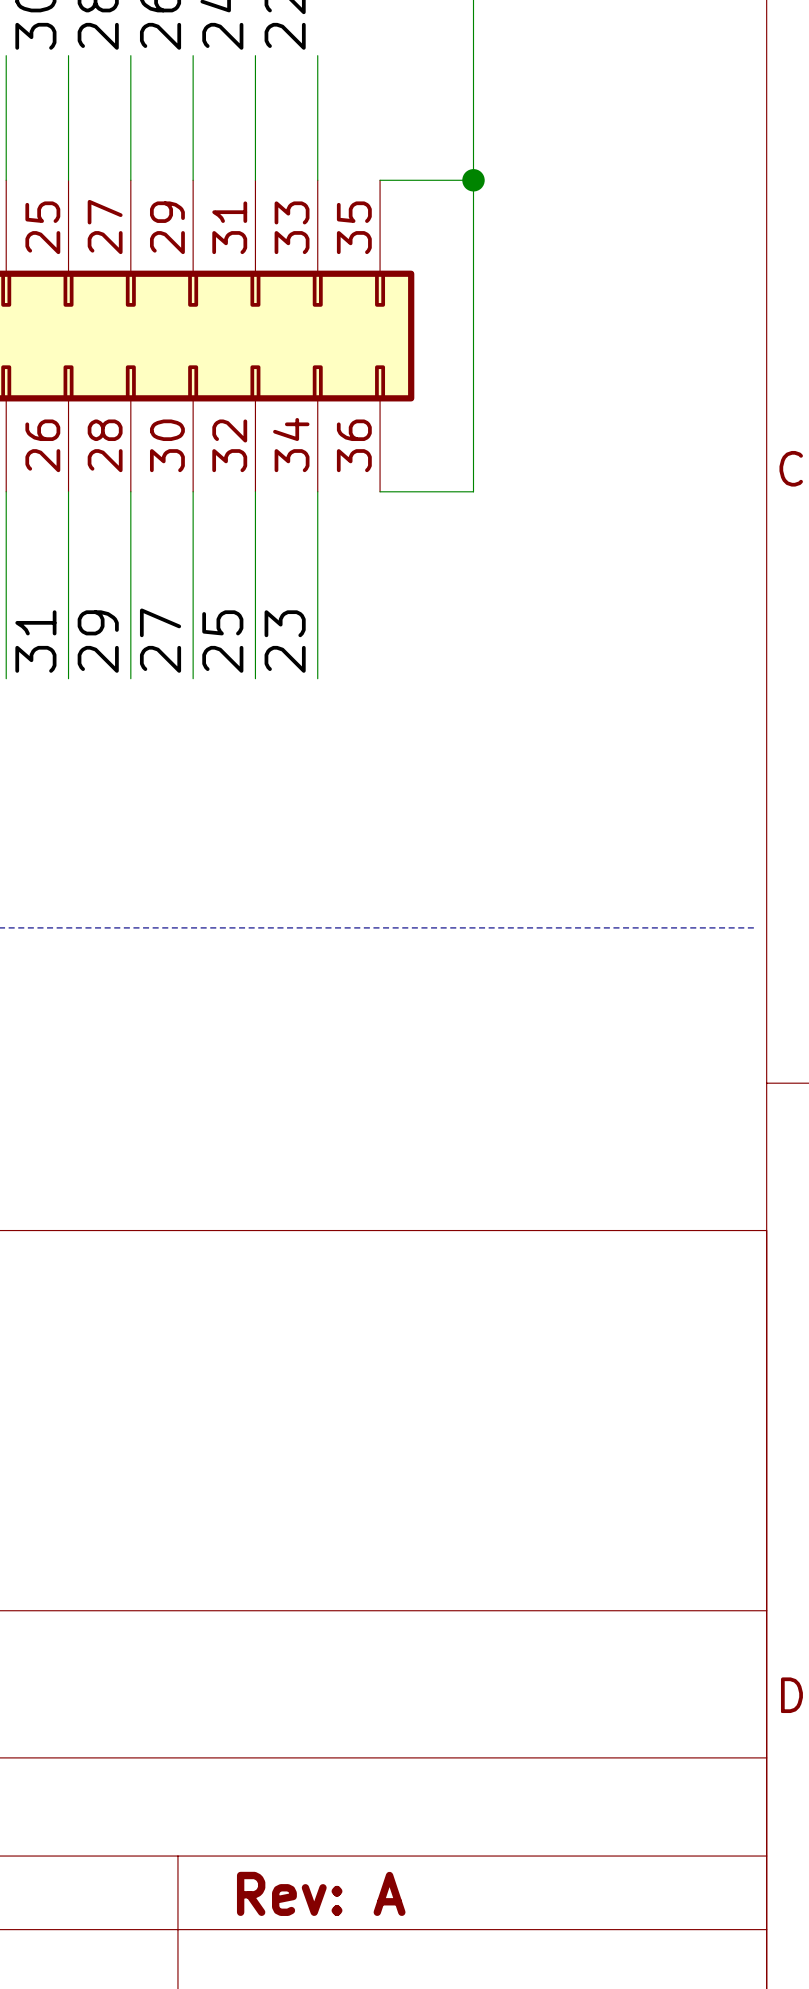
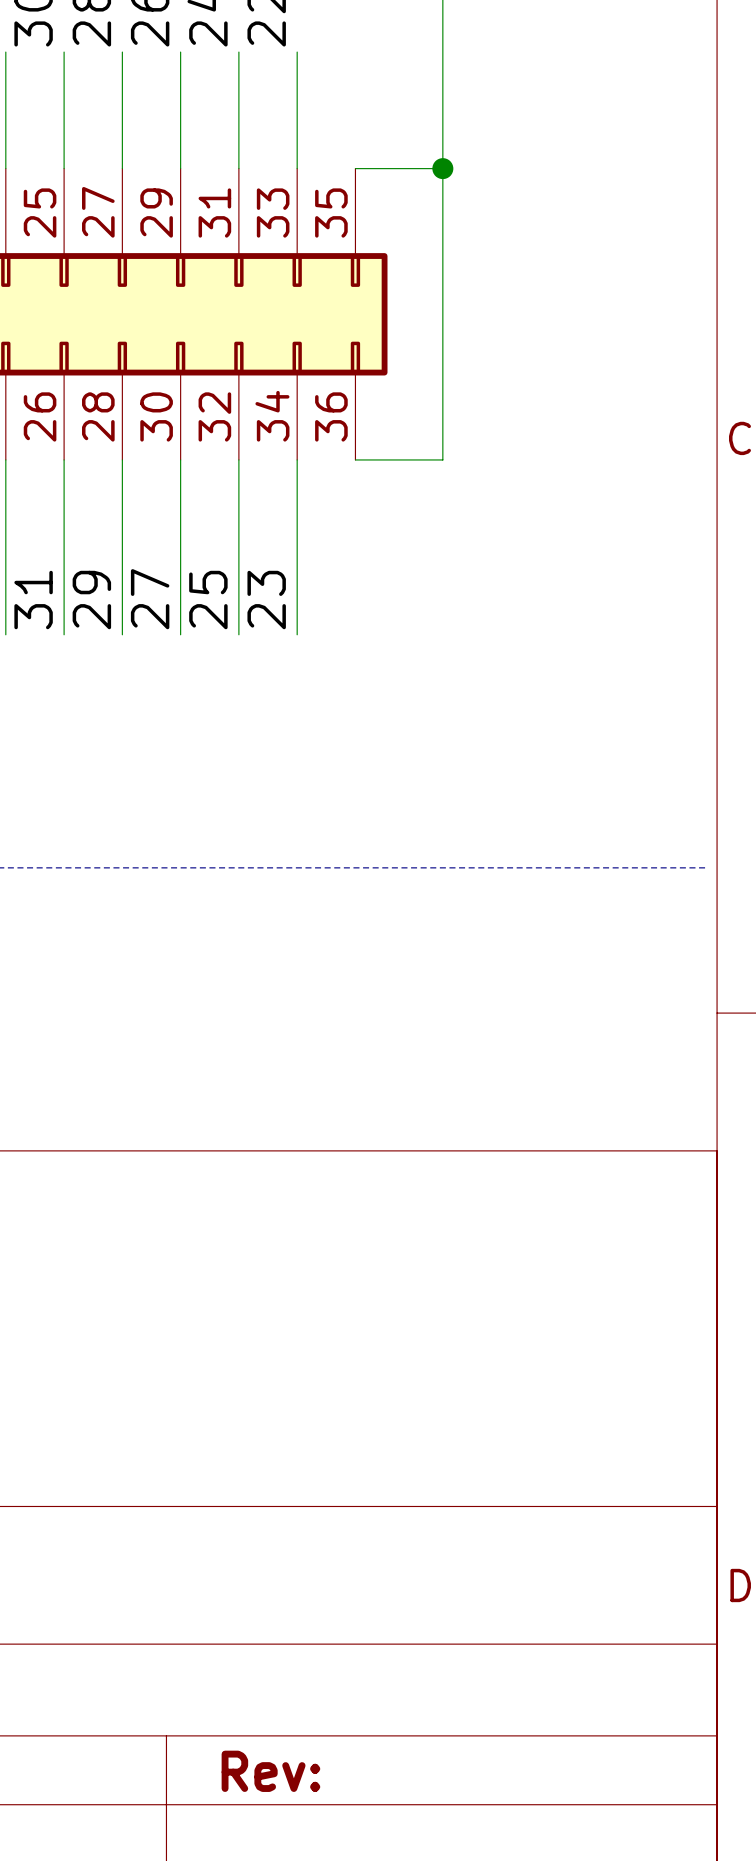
title block: Rev: A (321, 1893) -> Rev: (270, 1771)

